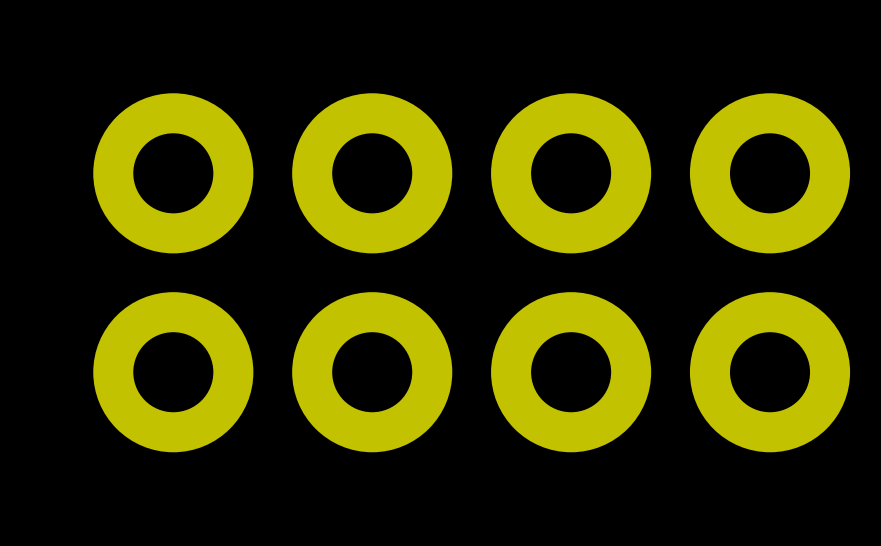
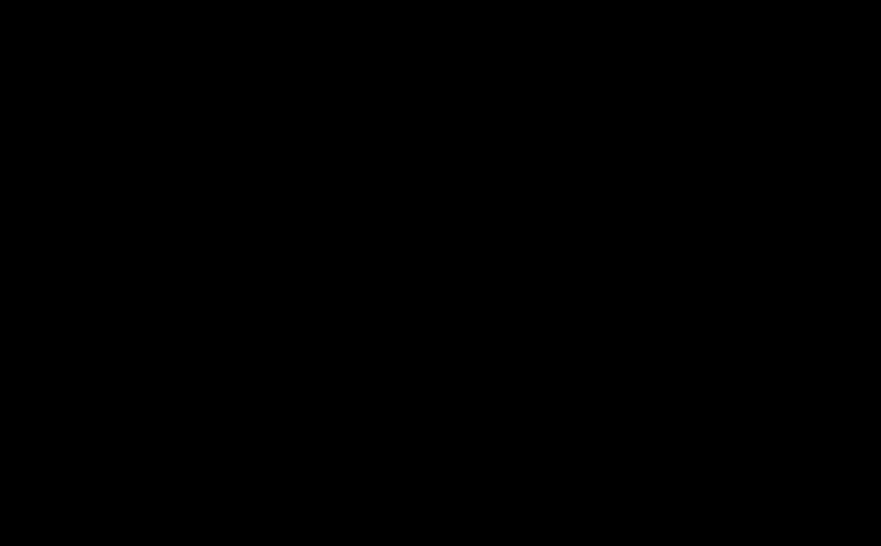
part: (173, 173) -> none
part: (372, 173) -> none
part: (571, 173) -> none
part: (770, 173) -> none
part: (173, 372) -> none
part: (372, 372) -> none
part: (571, 372) -> none
part: (770, 372) -> none

